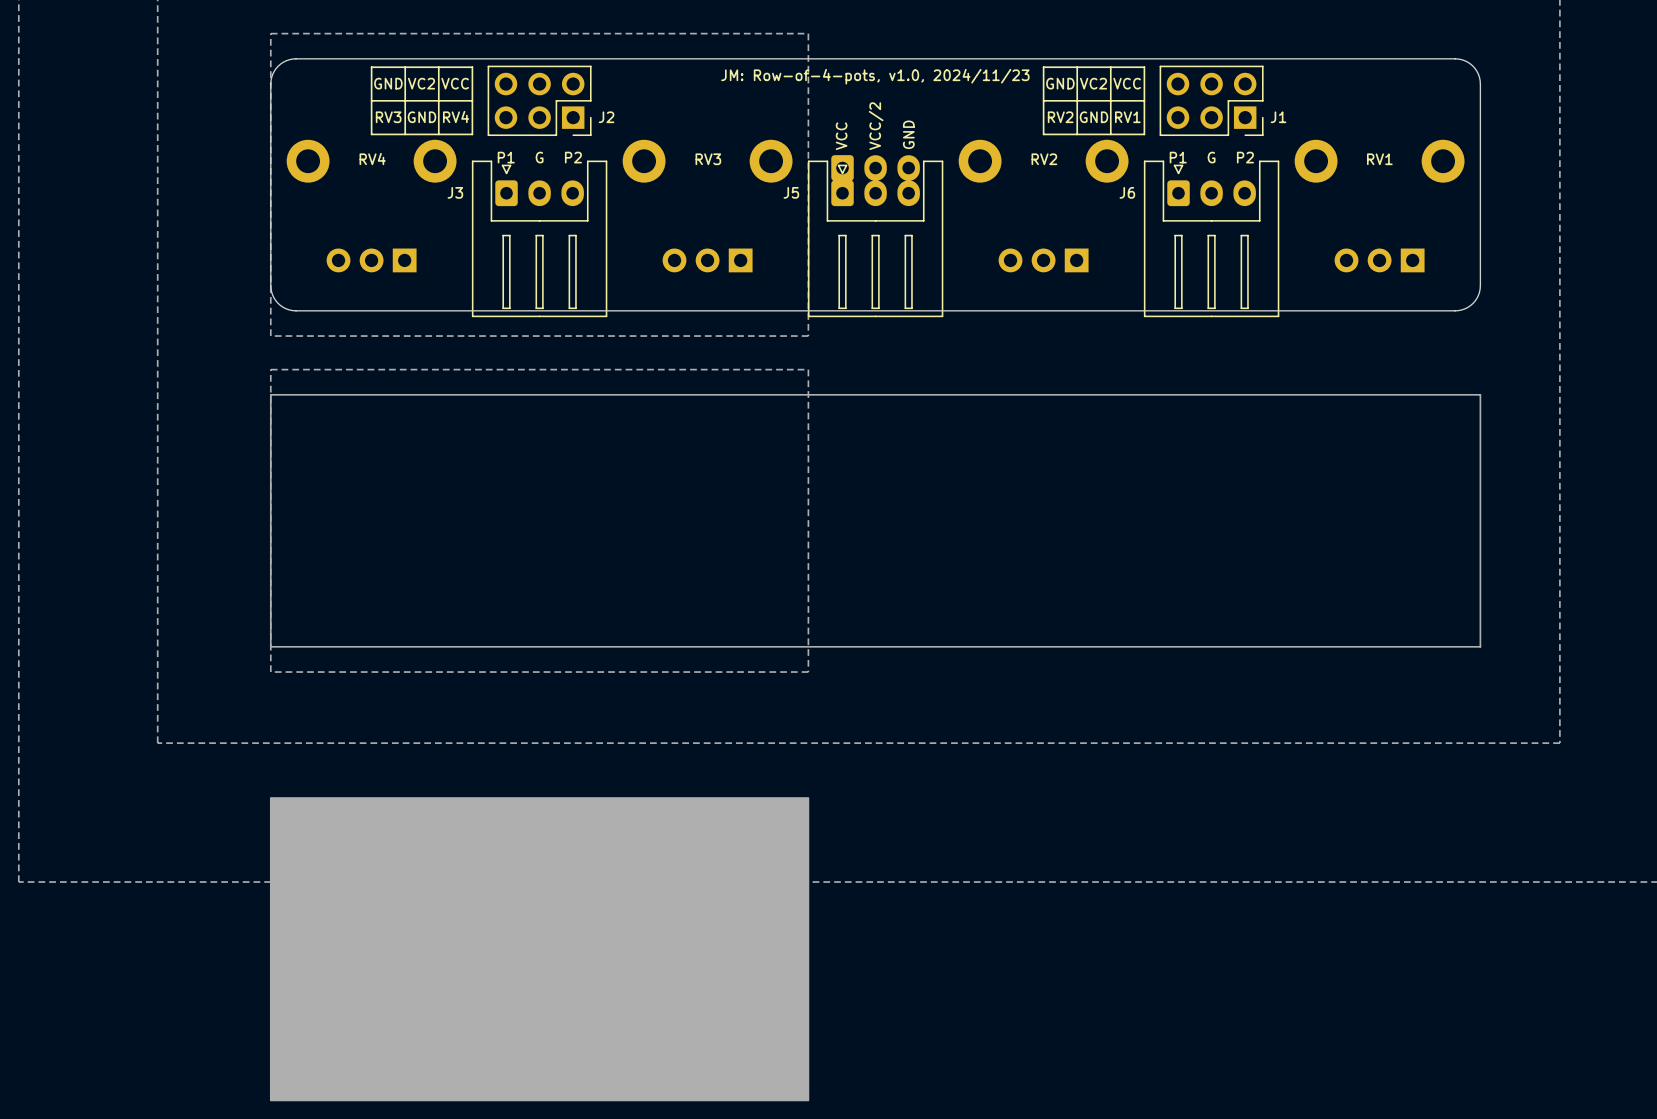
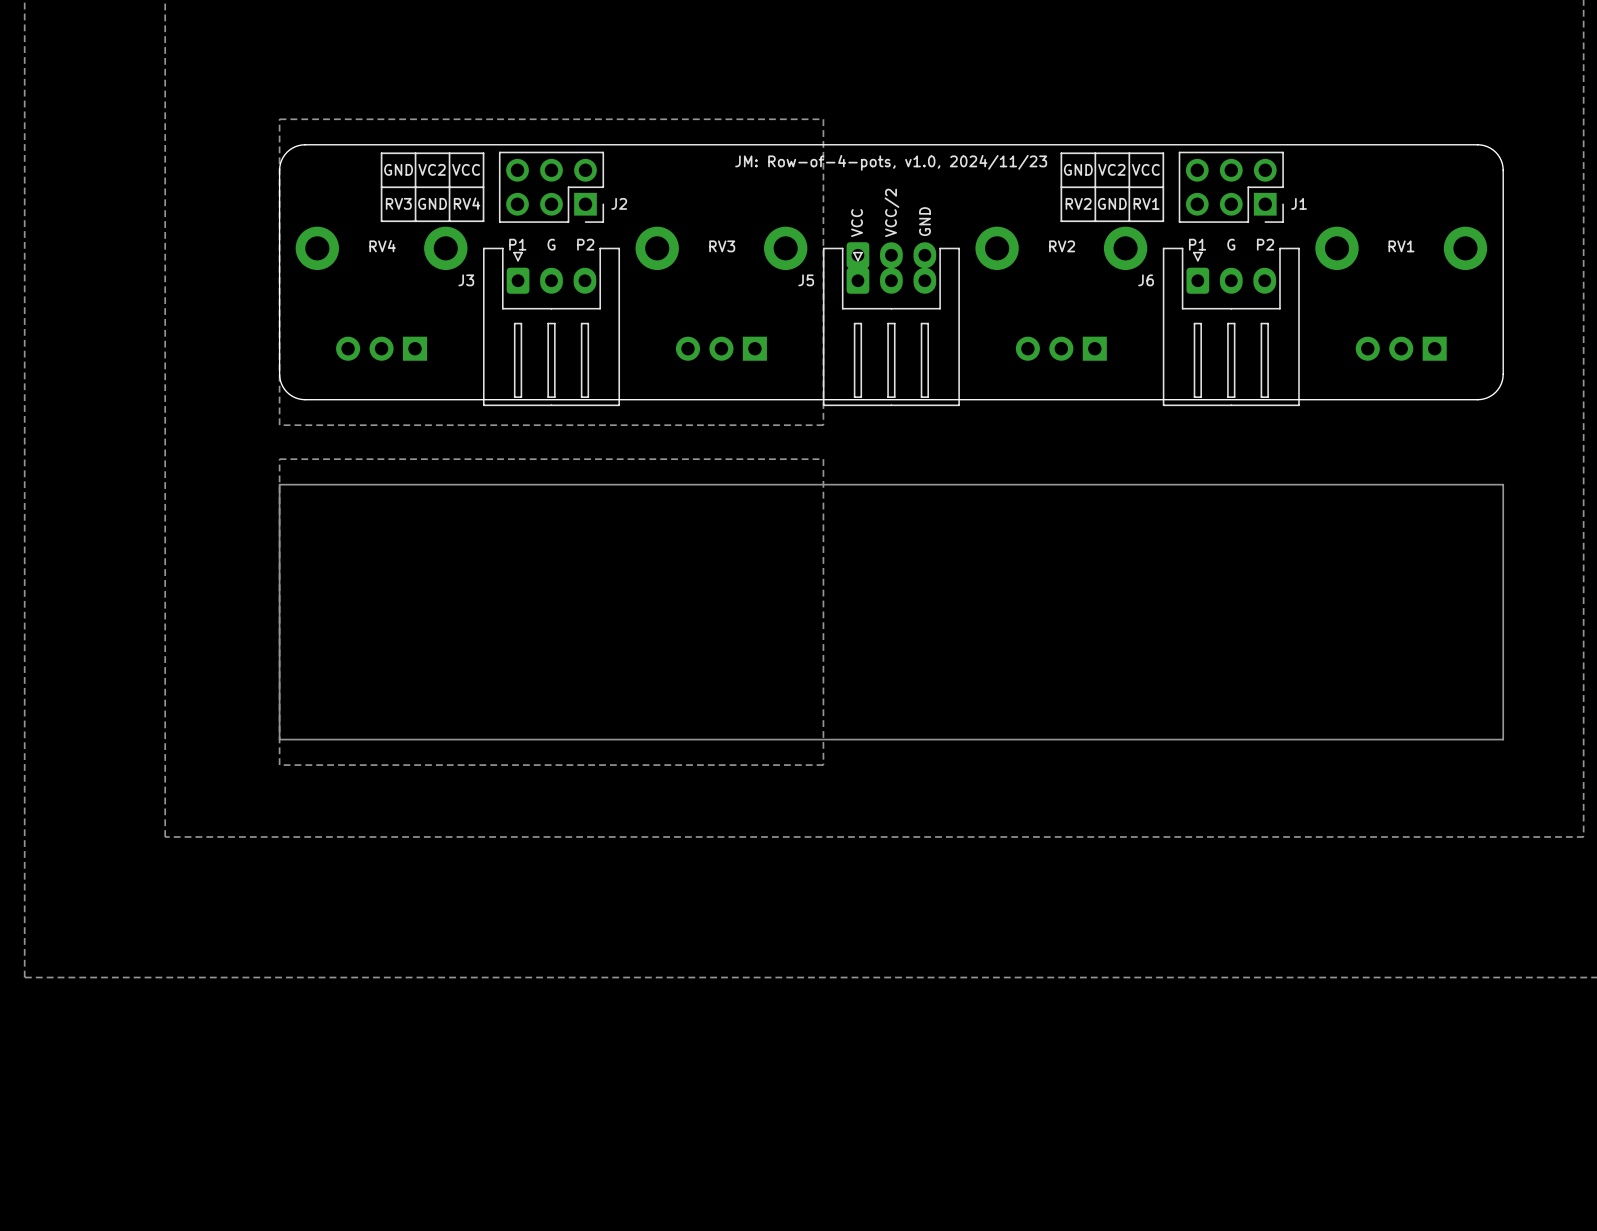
drawing: [269, 797, 810, 1102] -> none

